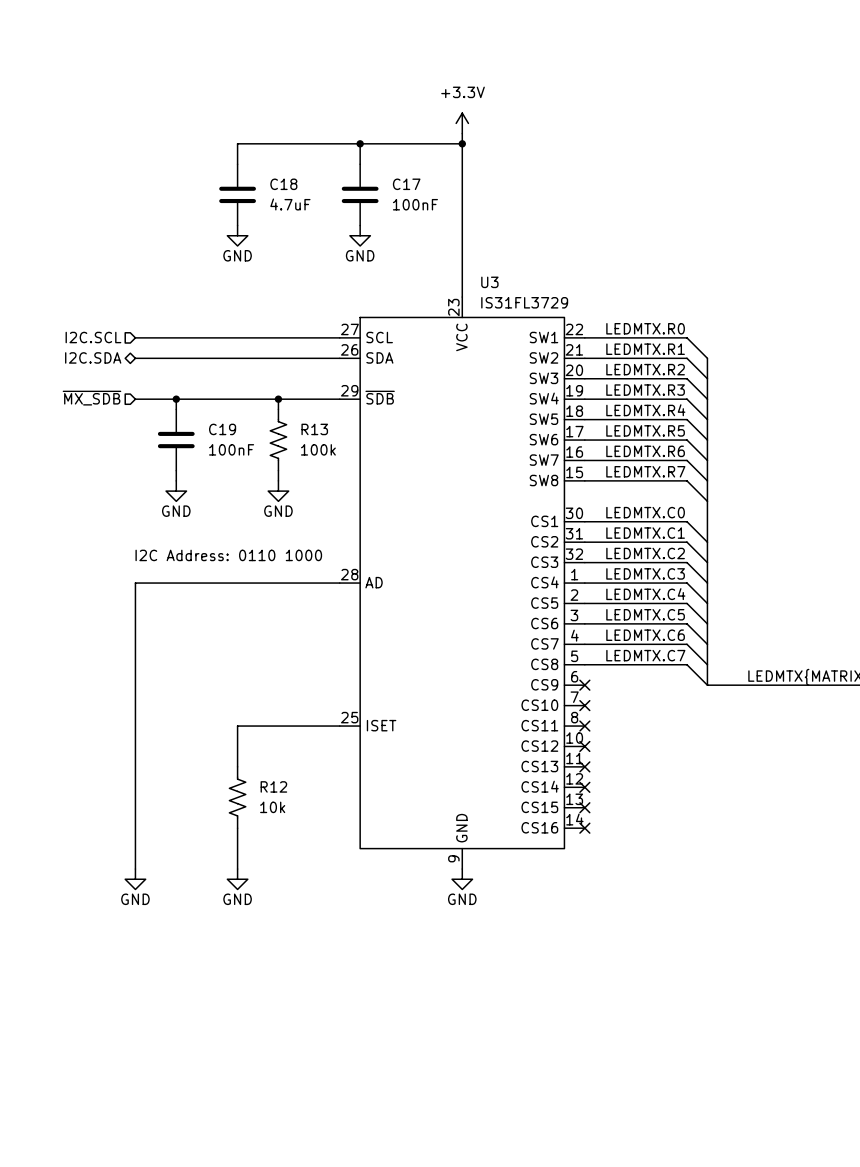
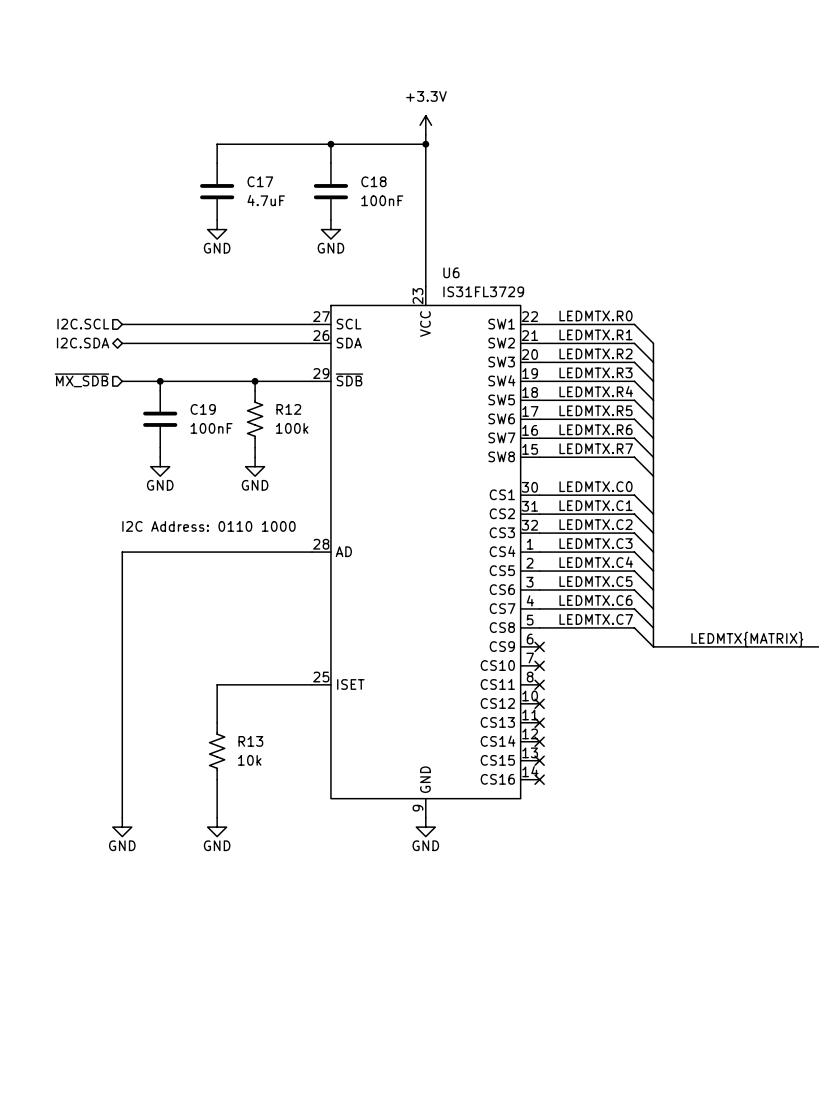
C18 name: C18 (283, 184) -> C17 (260, 181)
C17 name: C17 (406, 184) -> C18 (373, 181)
U3 name: U3 (489, 282) -> U6 (451, 272)
R13 name: R13 (314, 429) -> R12 (288, 409)
R12 name: R12 (273, 786) -> R13 (250, 741)

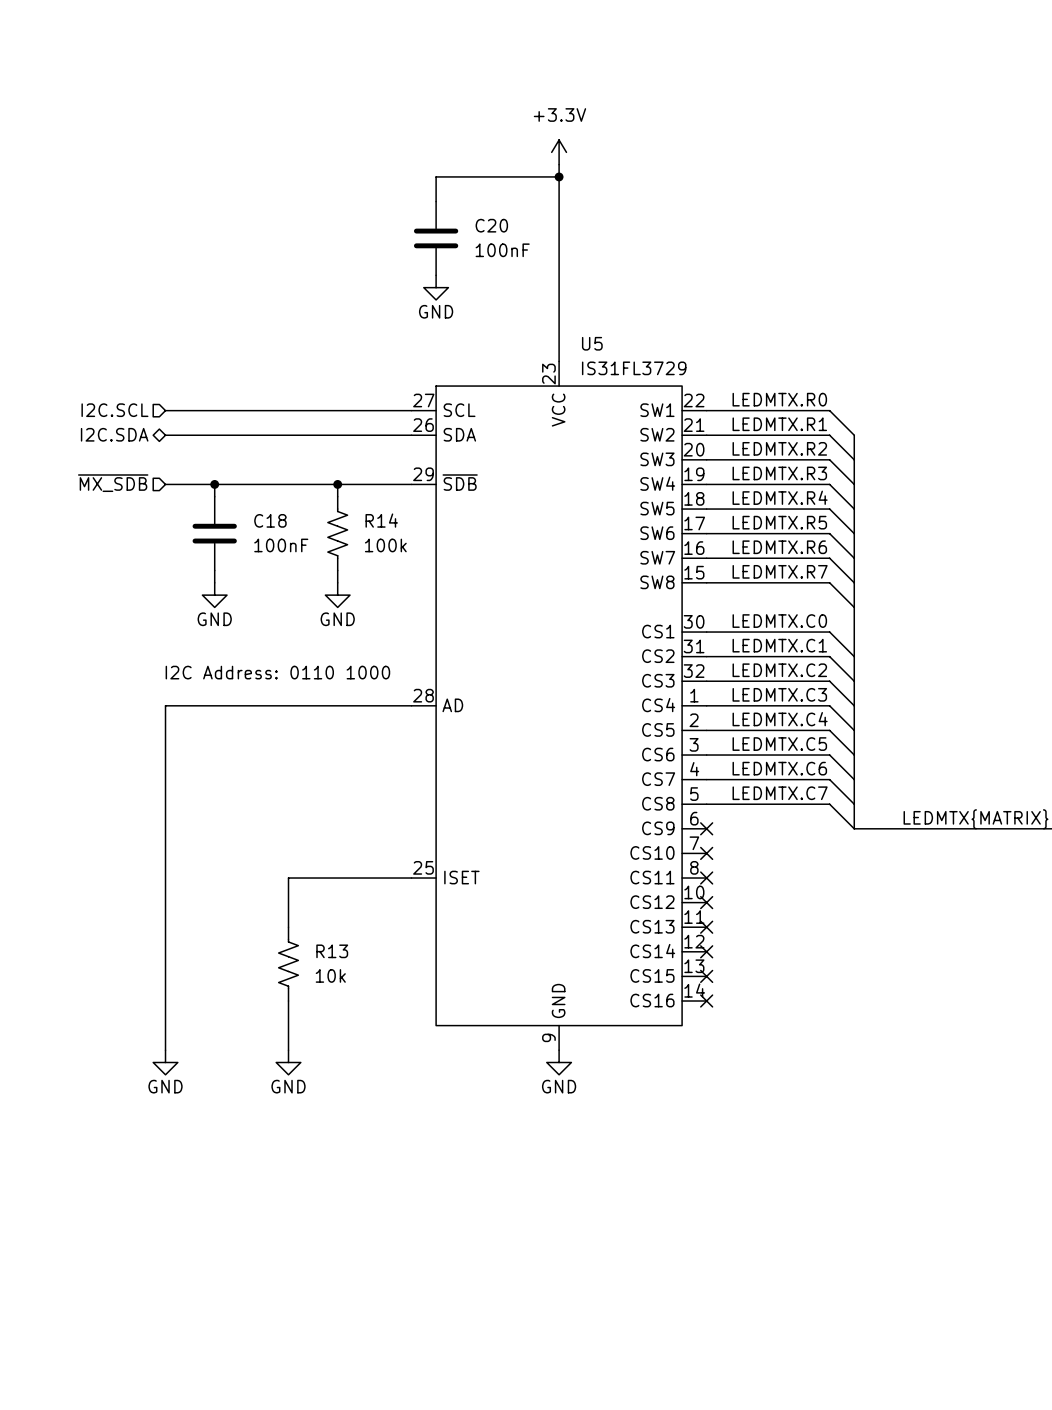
wire: (330, 144) (217, 144) (217, 163) -> none
junction: (330, 144) -> none
C18 name: C18 (373, 181) -> C20 (491, 225)
C17: 4.7uF (217, 191) -> none
power symbol: GND (217, 229) -> none
U6 name: U6 (451, 272) -> U5 (592, 343)
C19 name: C19 (203, 409) -> C18 (270, 520)
R12 name: R12 (288, 409) -> R14 (381, 520)

